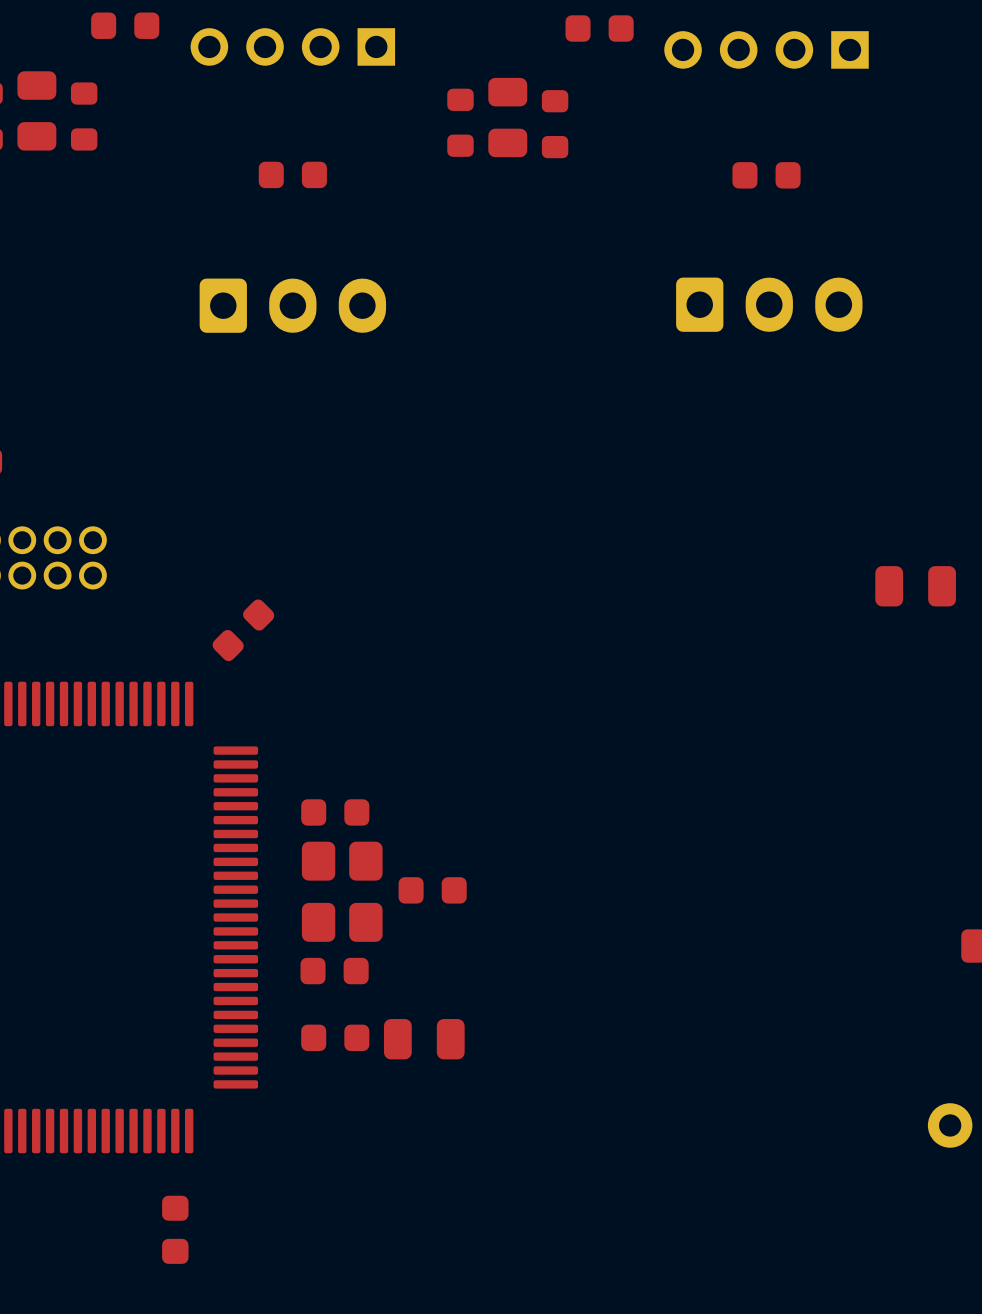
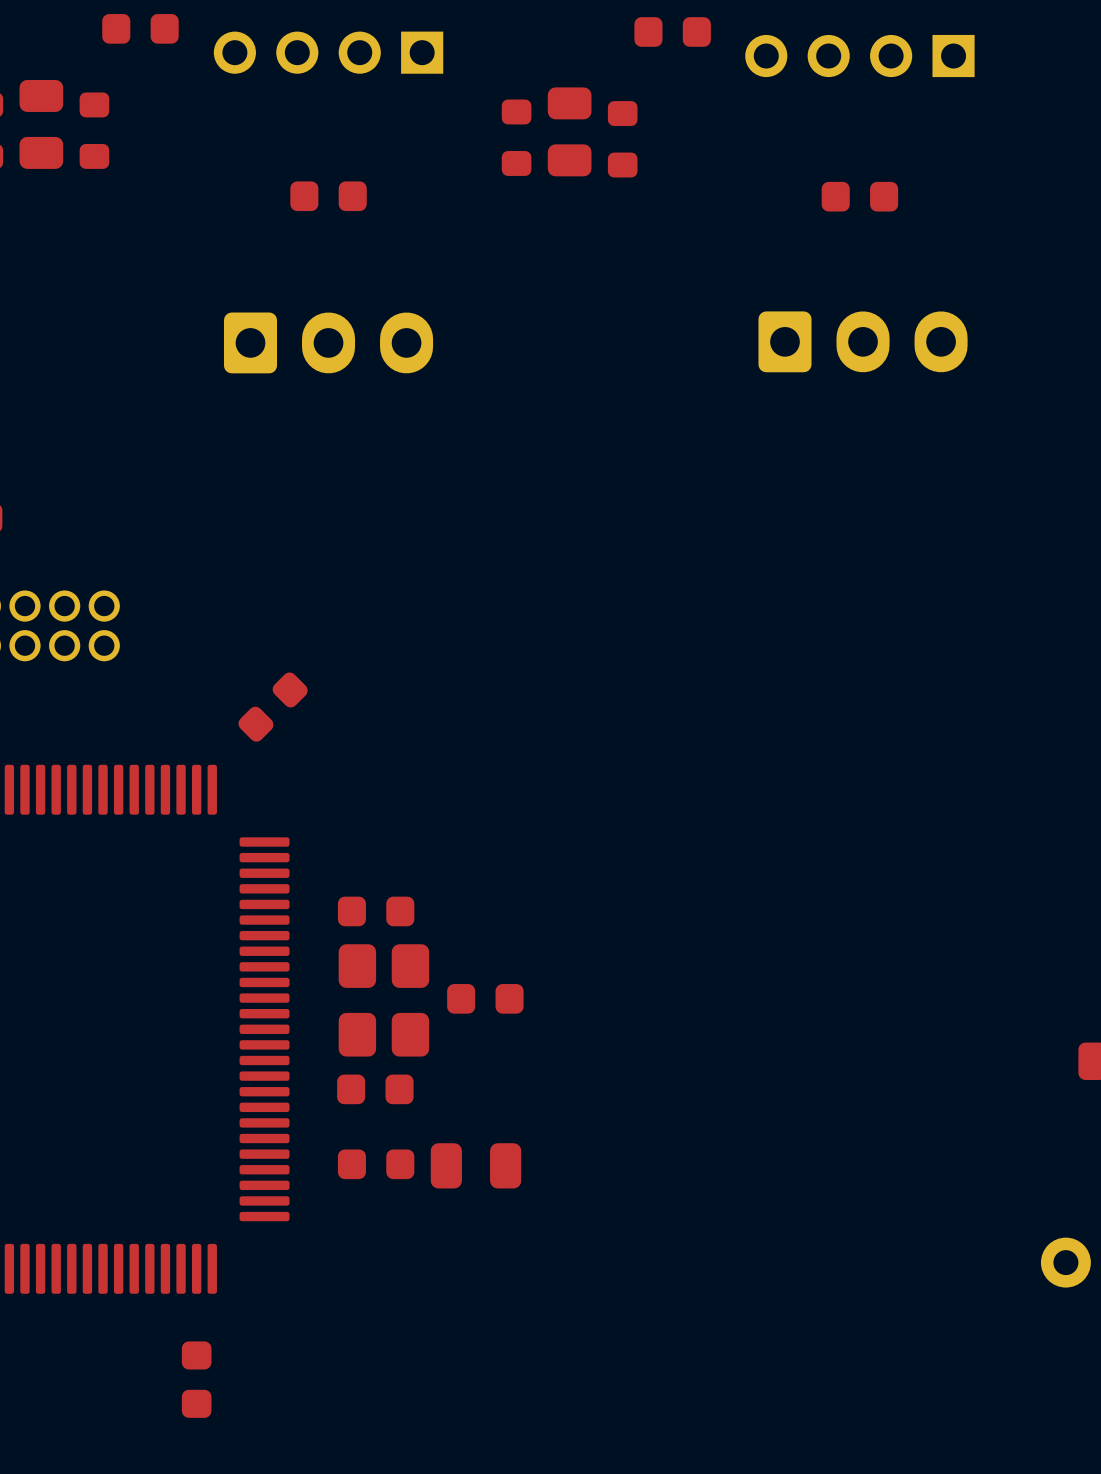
part: (915, 586) -> none

